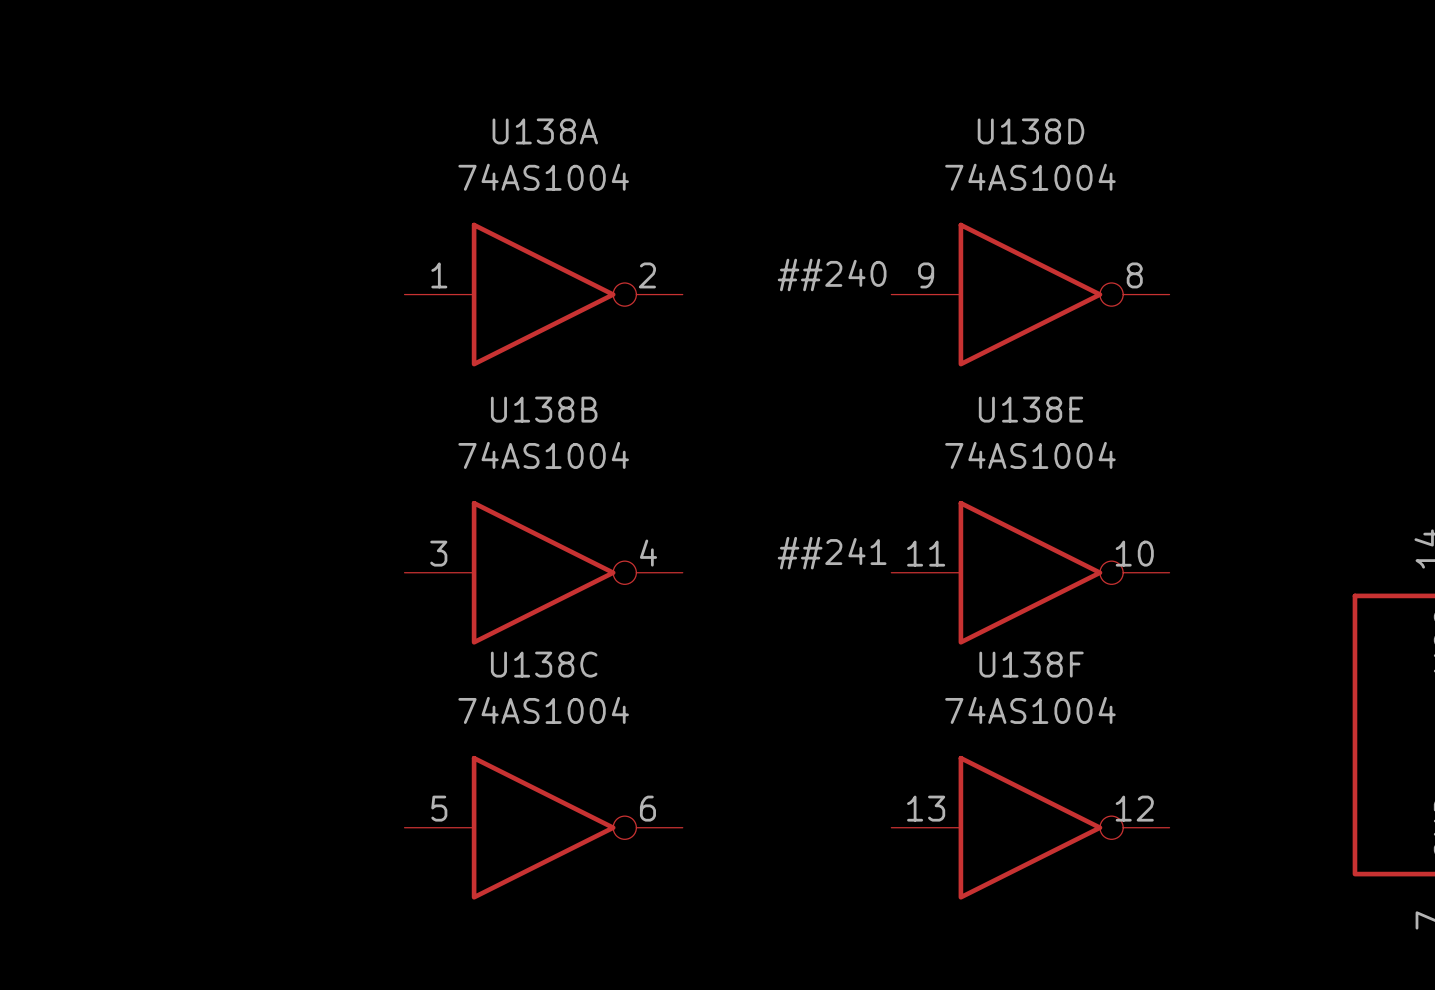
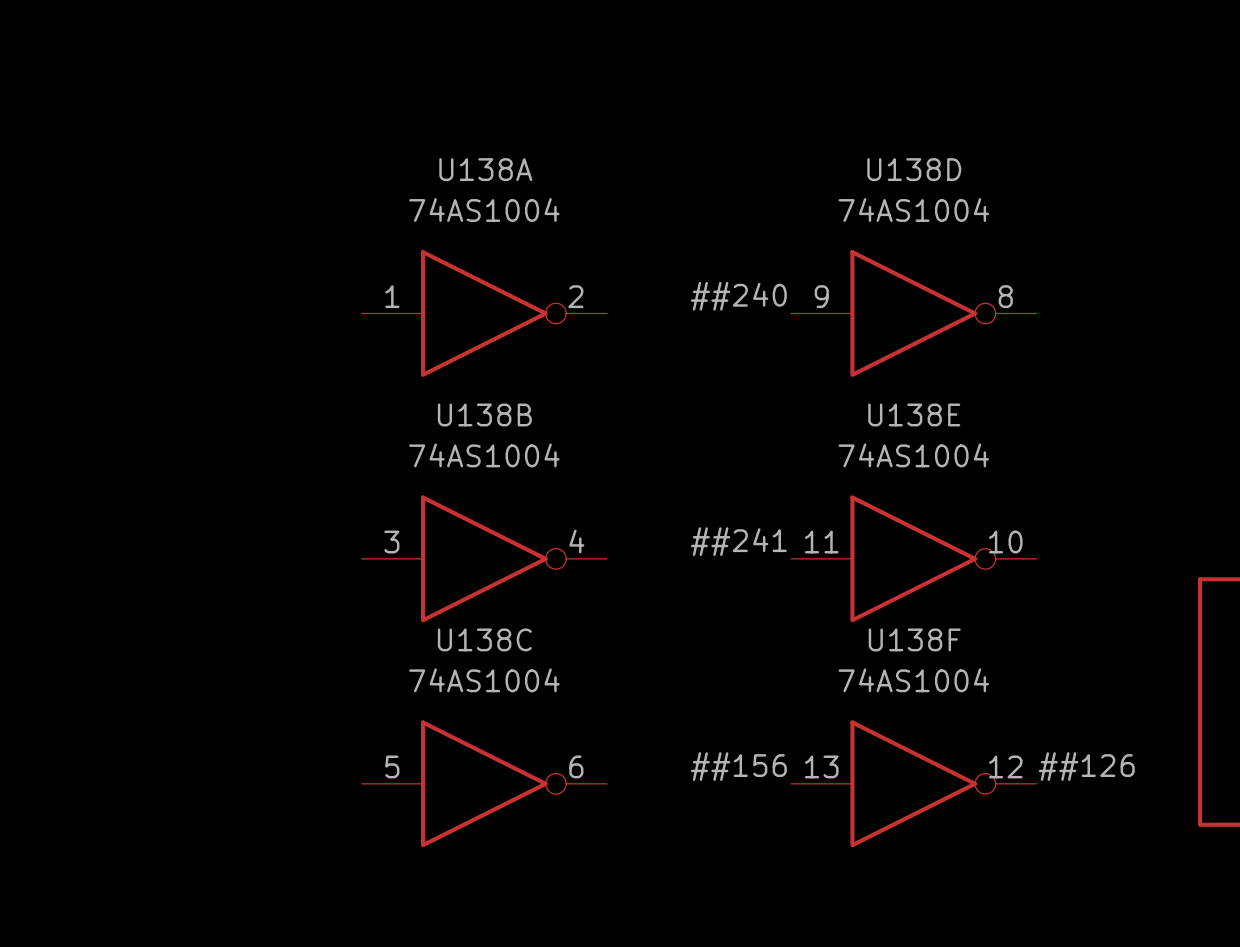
label: none -> ##156 (738, 766)
label: none -> ##126 (1086, 766)

